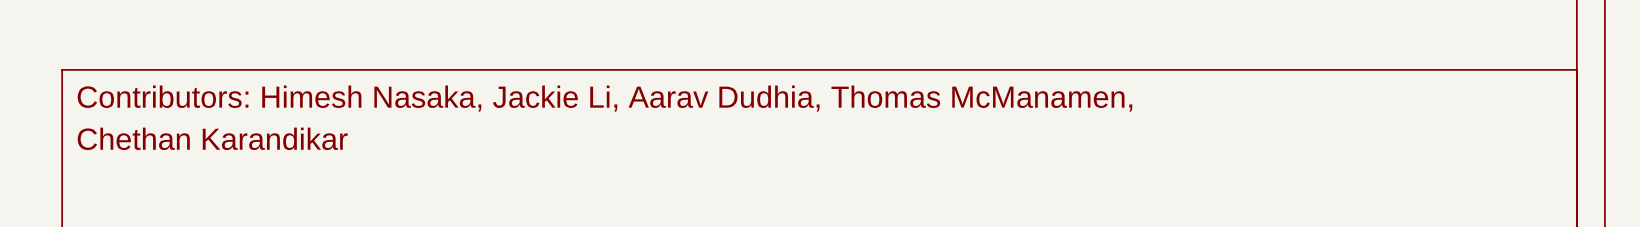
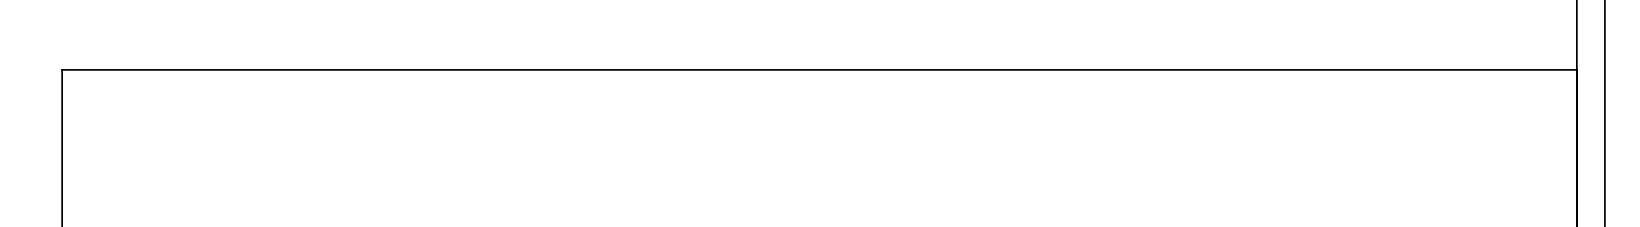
title block: Contributors: Himesh Nasaka, Jackie Li, Aarav Dudhia, Thomas McManamen, (604, 98) -> none
title block: Chethan Karandikar (212, 138) -> none

